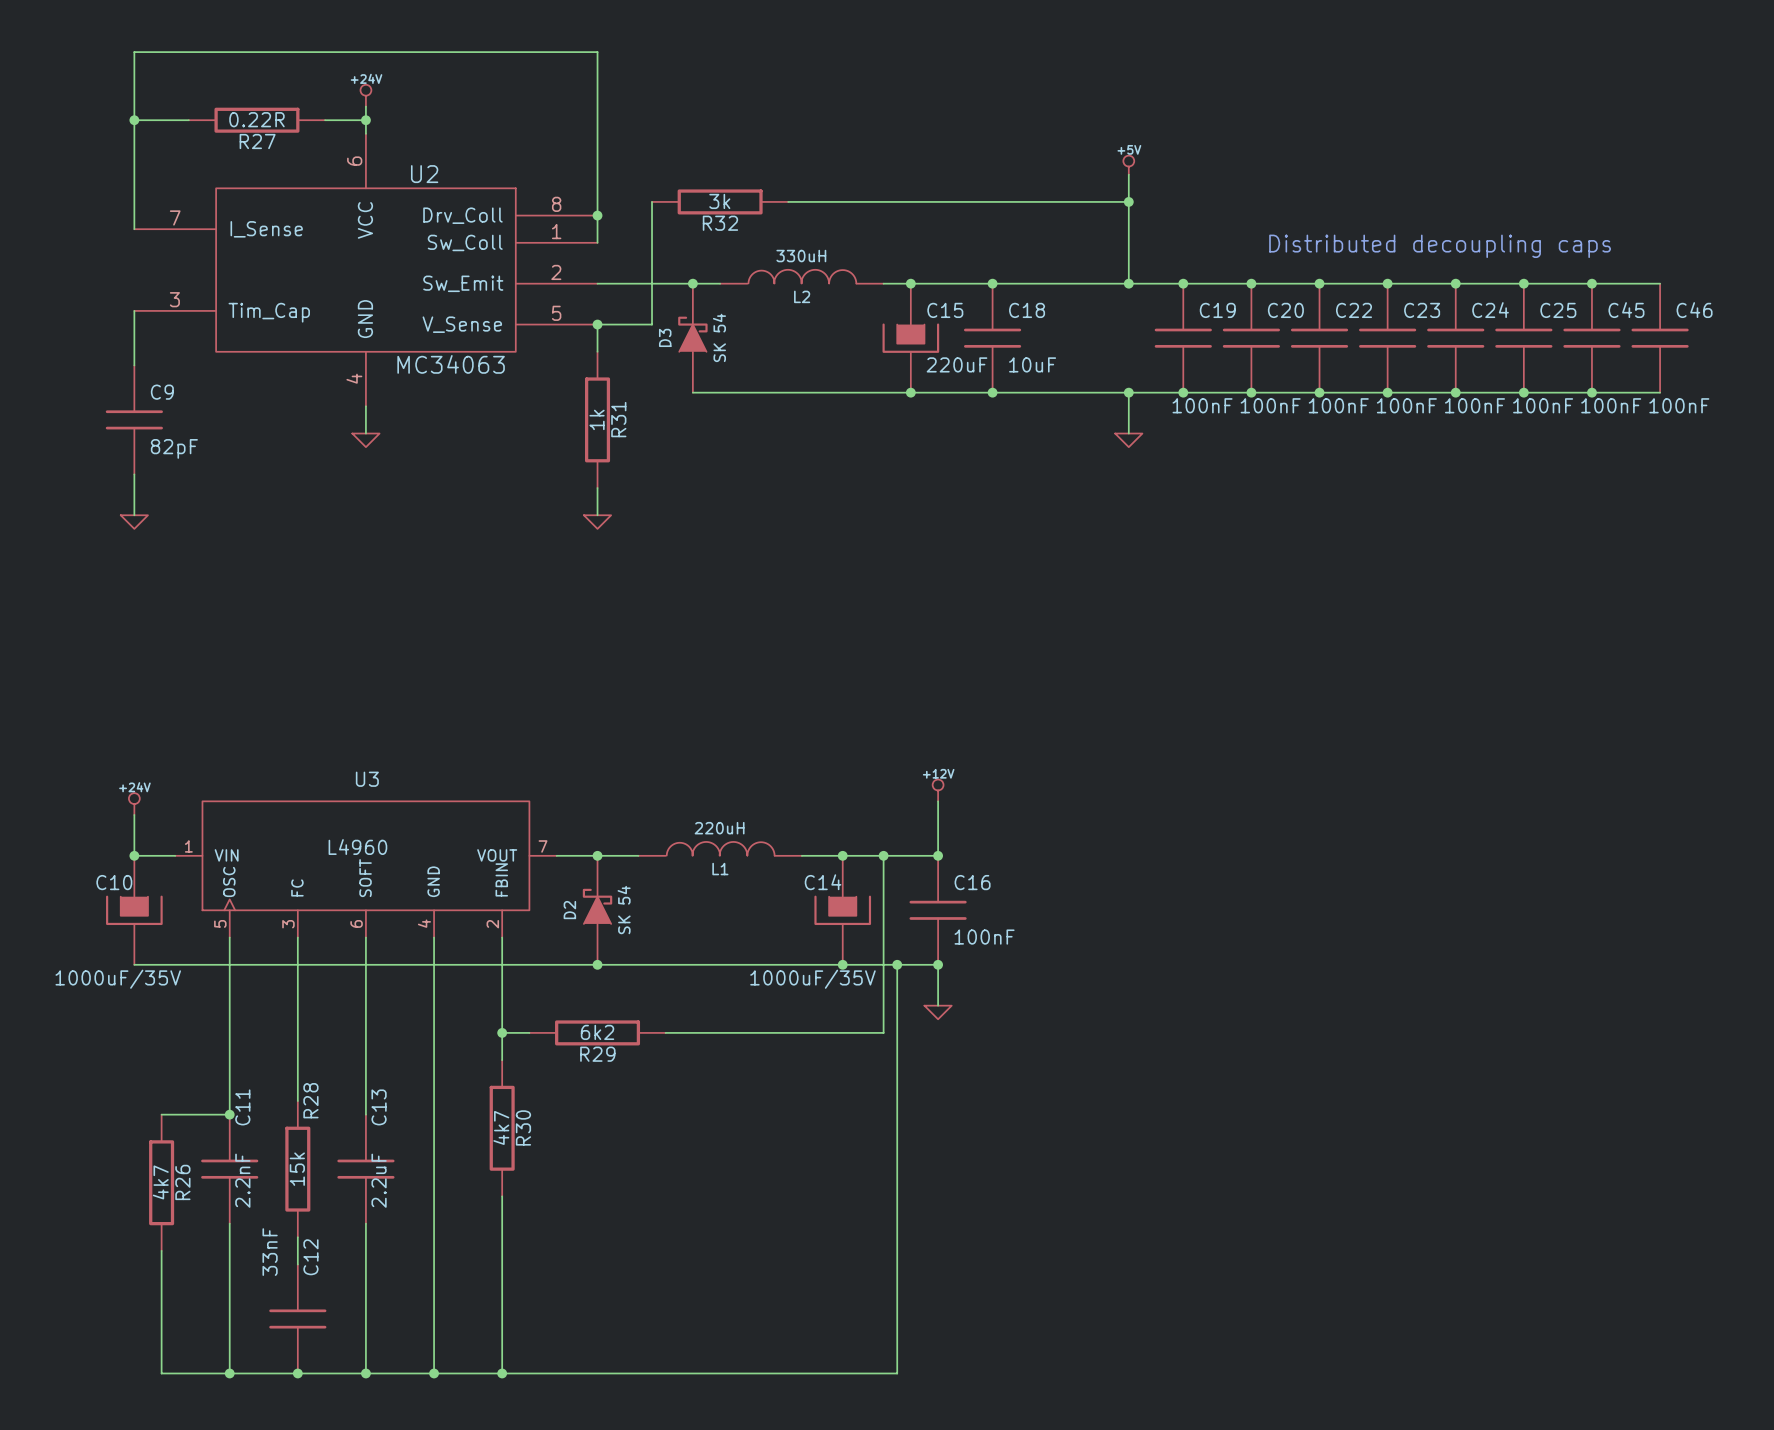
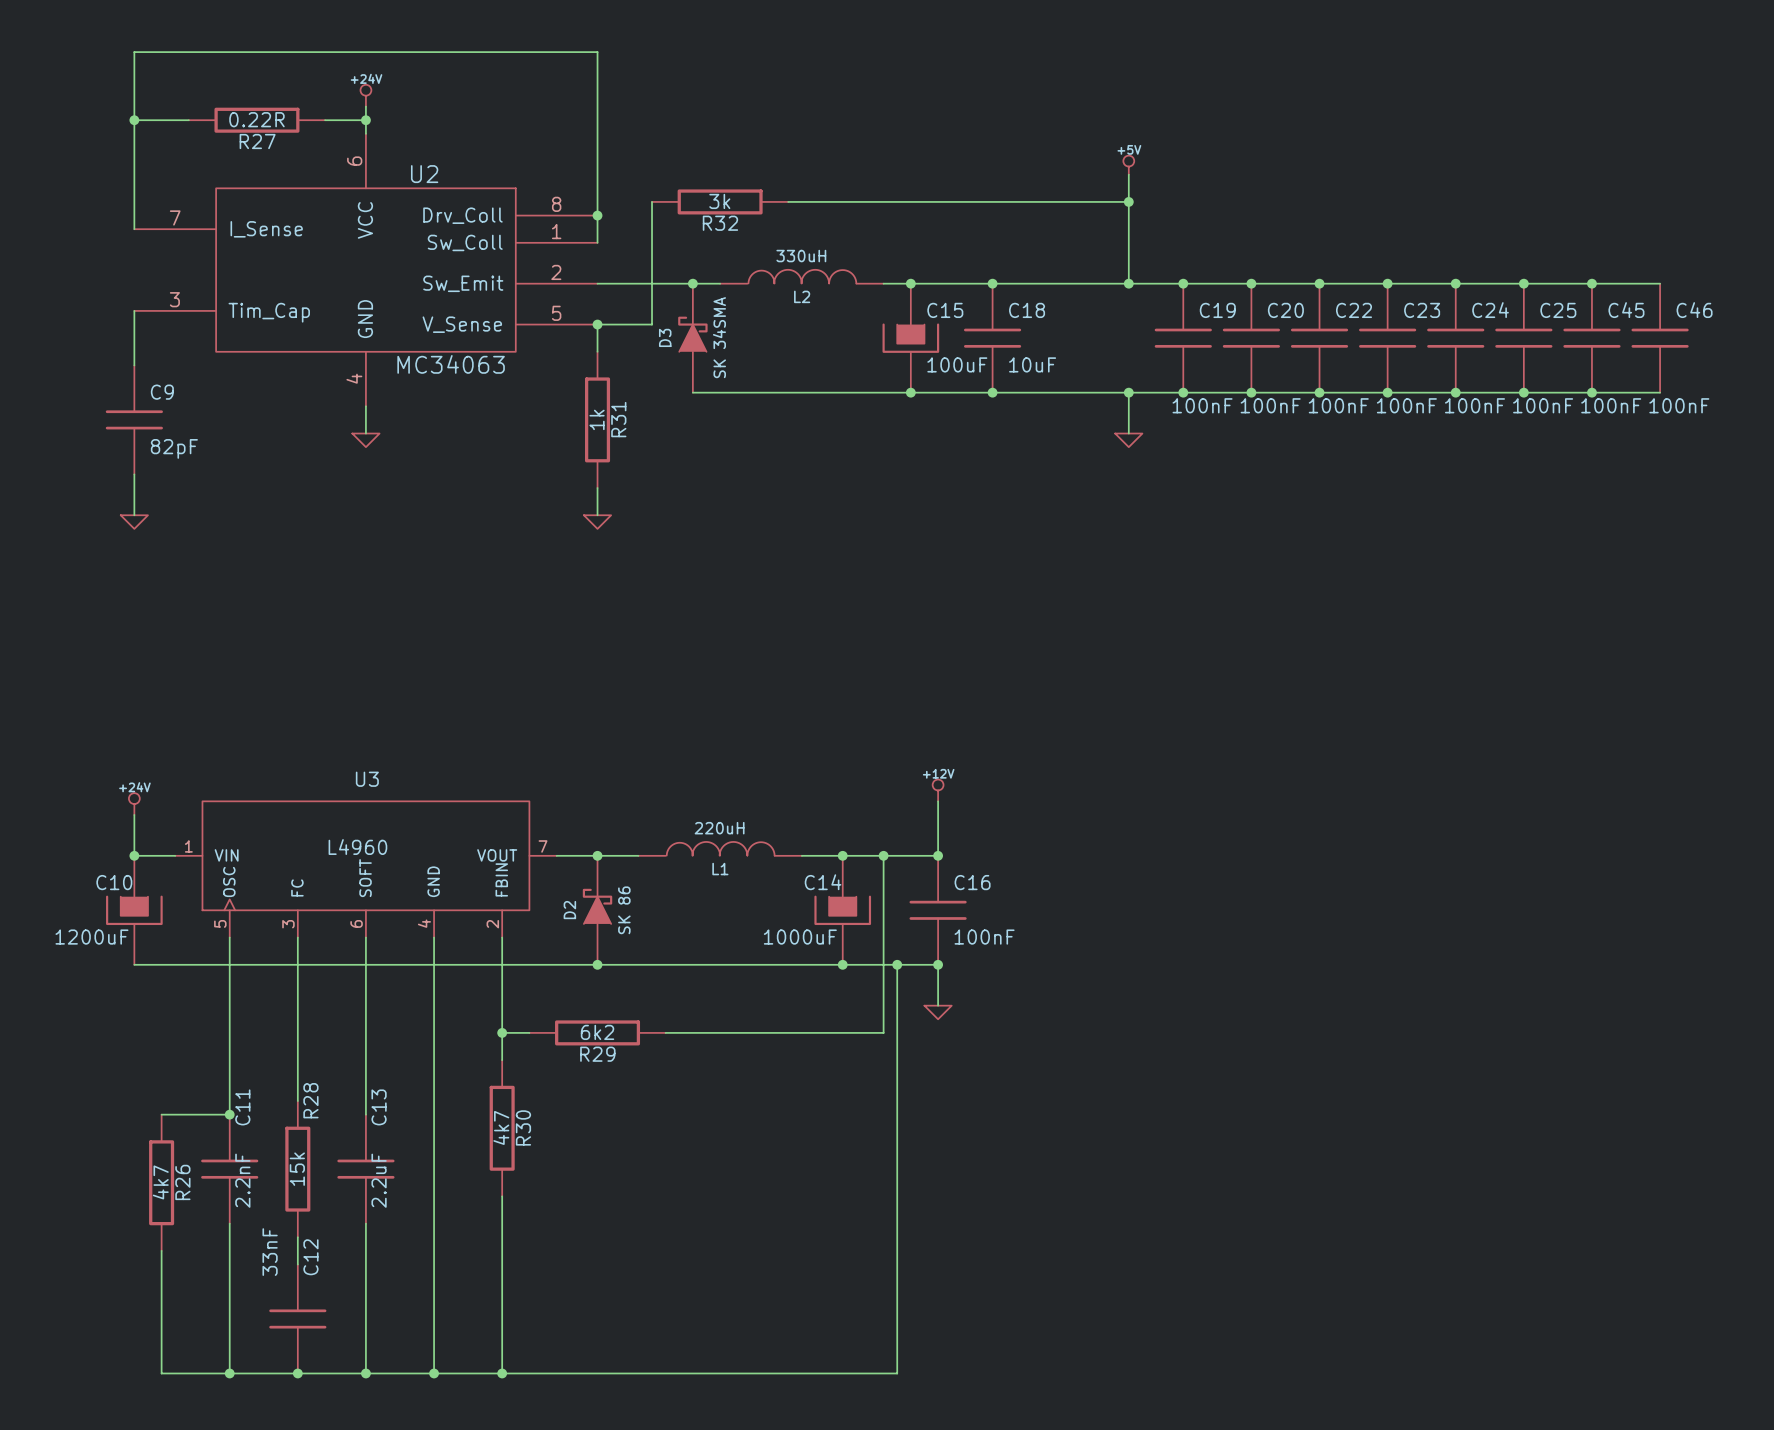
text: Distributed decoupling caps (1440, 246) -> none
D3 value: SK 54 (719, 337) -> SK 34SMA (719, 337)
C15 value: 220uF (957, 364) -> 100uF (957, 364)
D2 value: SK 54 (624, 910) -> SK 86 (624, 910)
C10 value: 1000uF/35V (118, 979) -> 1200uF (91, 937)
C14 value: 1000uF/35V (812, 979) -> 1000uF (800, 937)

